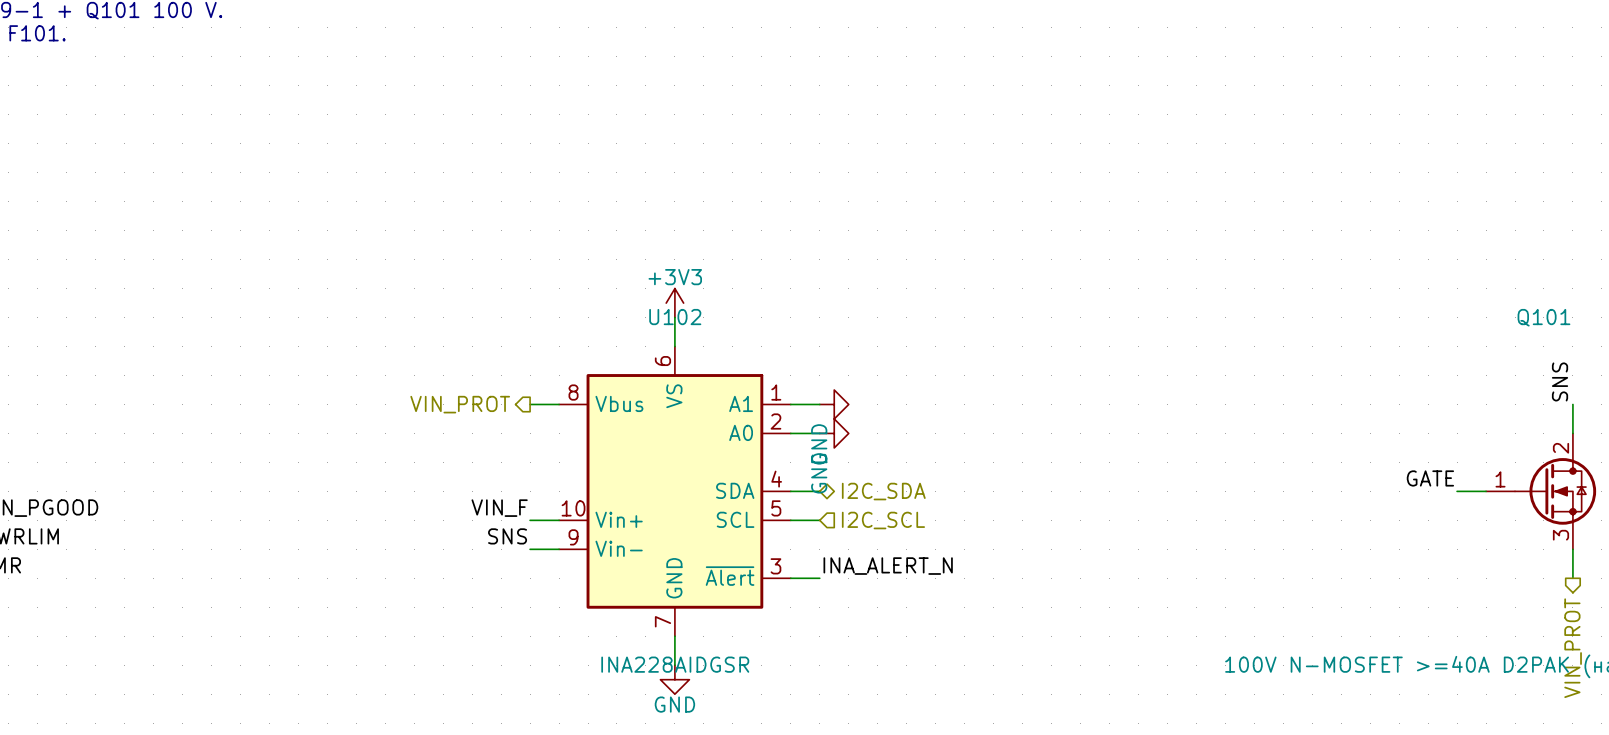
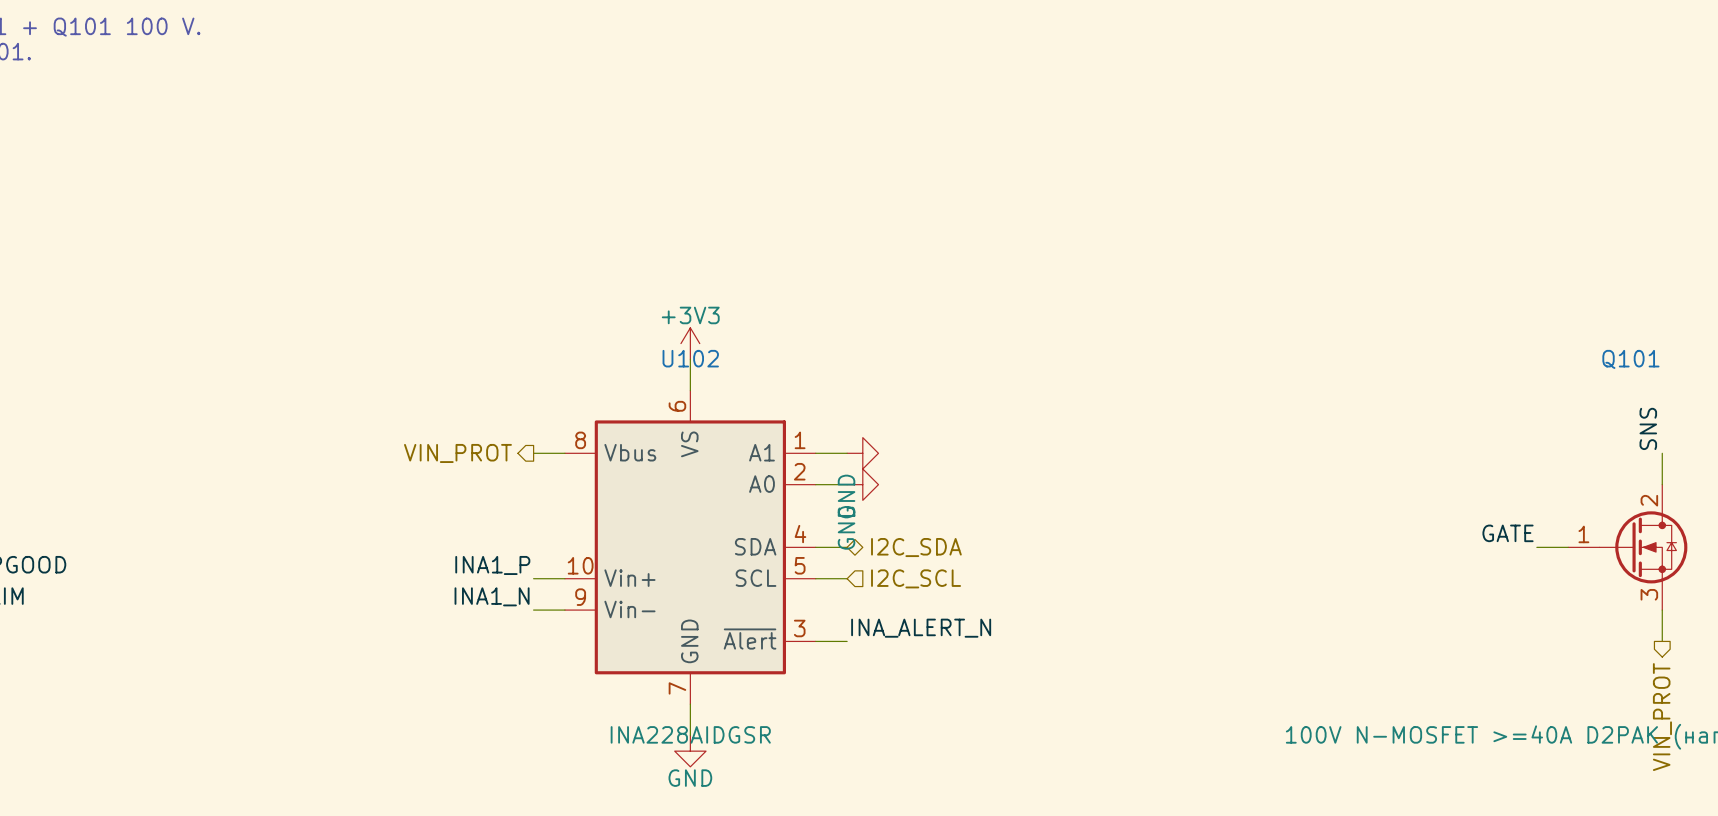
label: VIN_F (499, 508) -> INA1_P (492, 565)
label: SNS (507, 536) -> INA1_N (492, 596)

